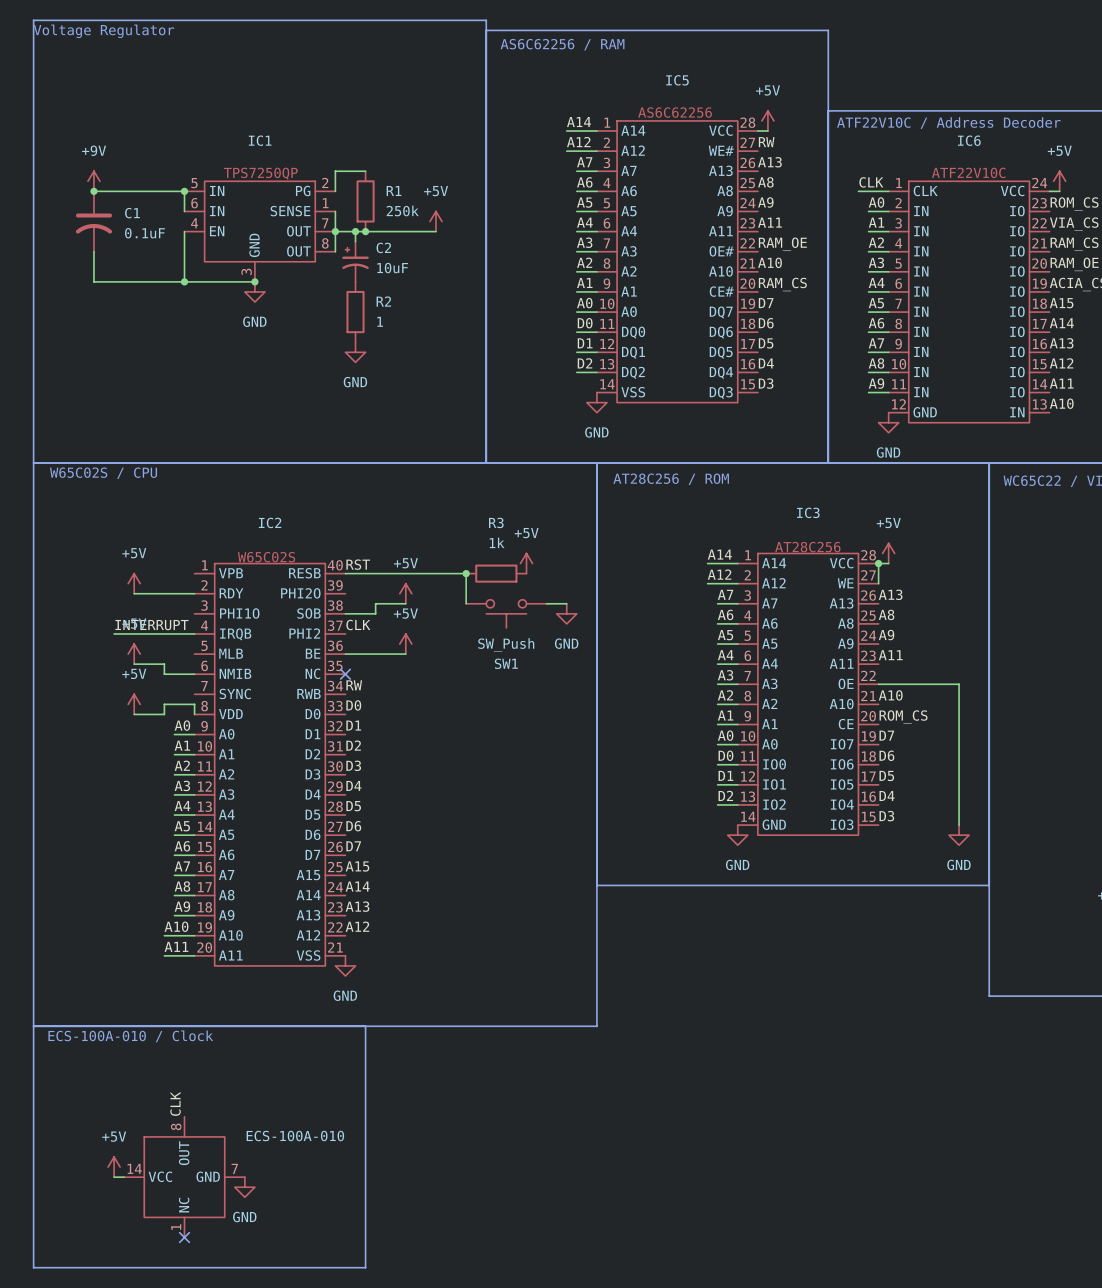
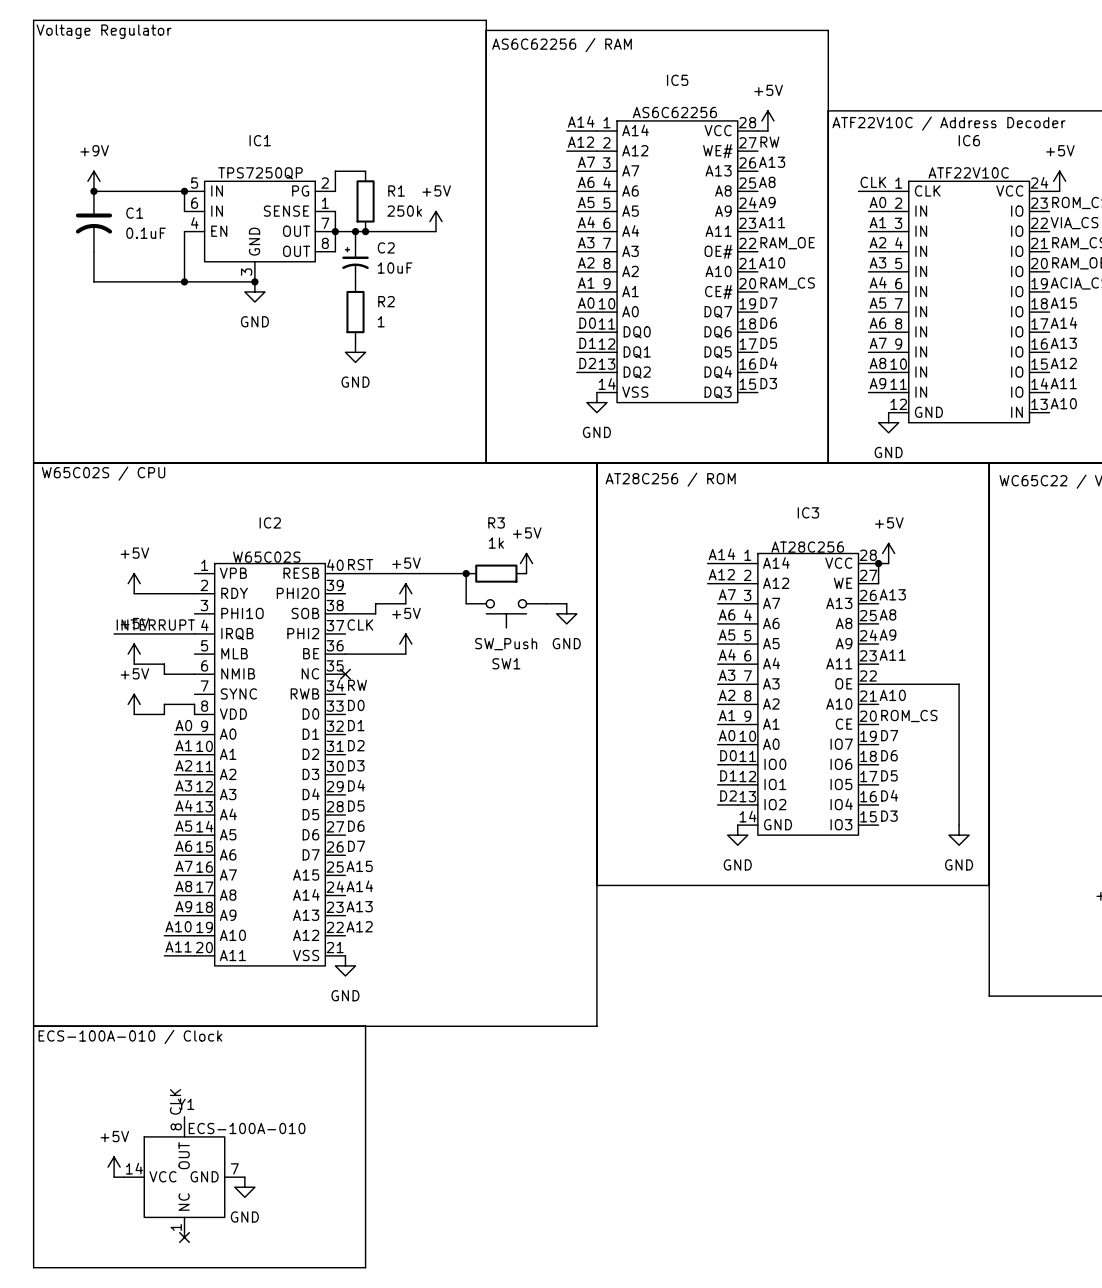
ECS-100A-010 text: none -> ECS-100A-010 (247, 1128)
ECS-100A-010 name: ECS-100A-010 (295, 1136) -> Y1 (186, 1104)

